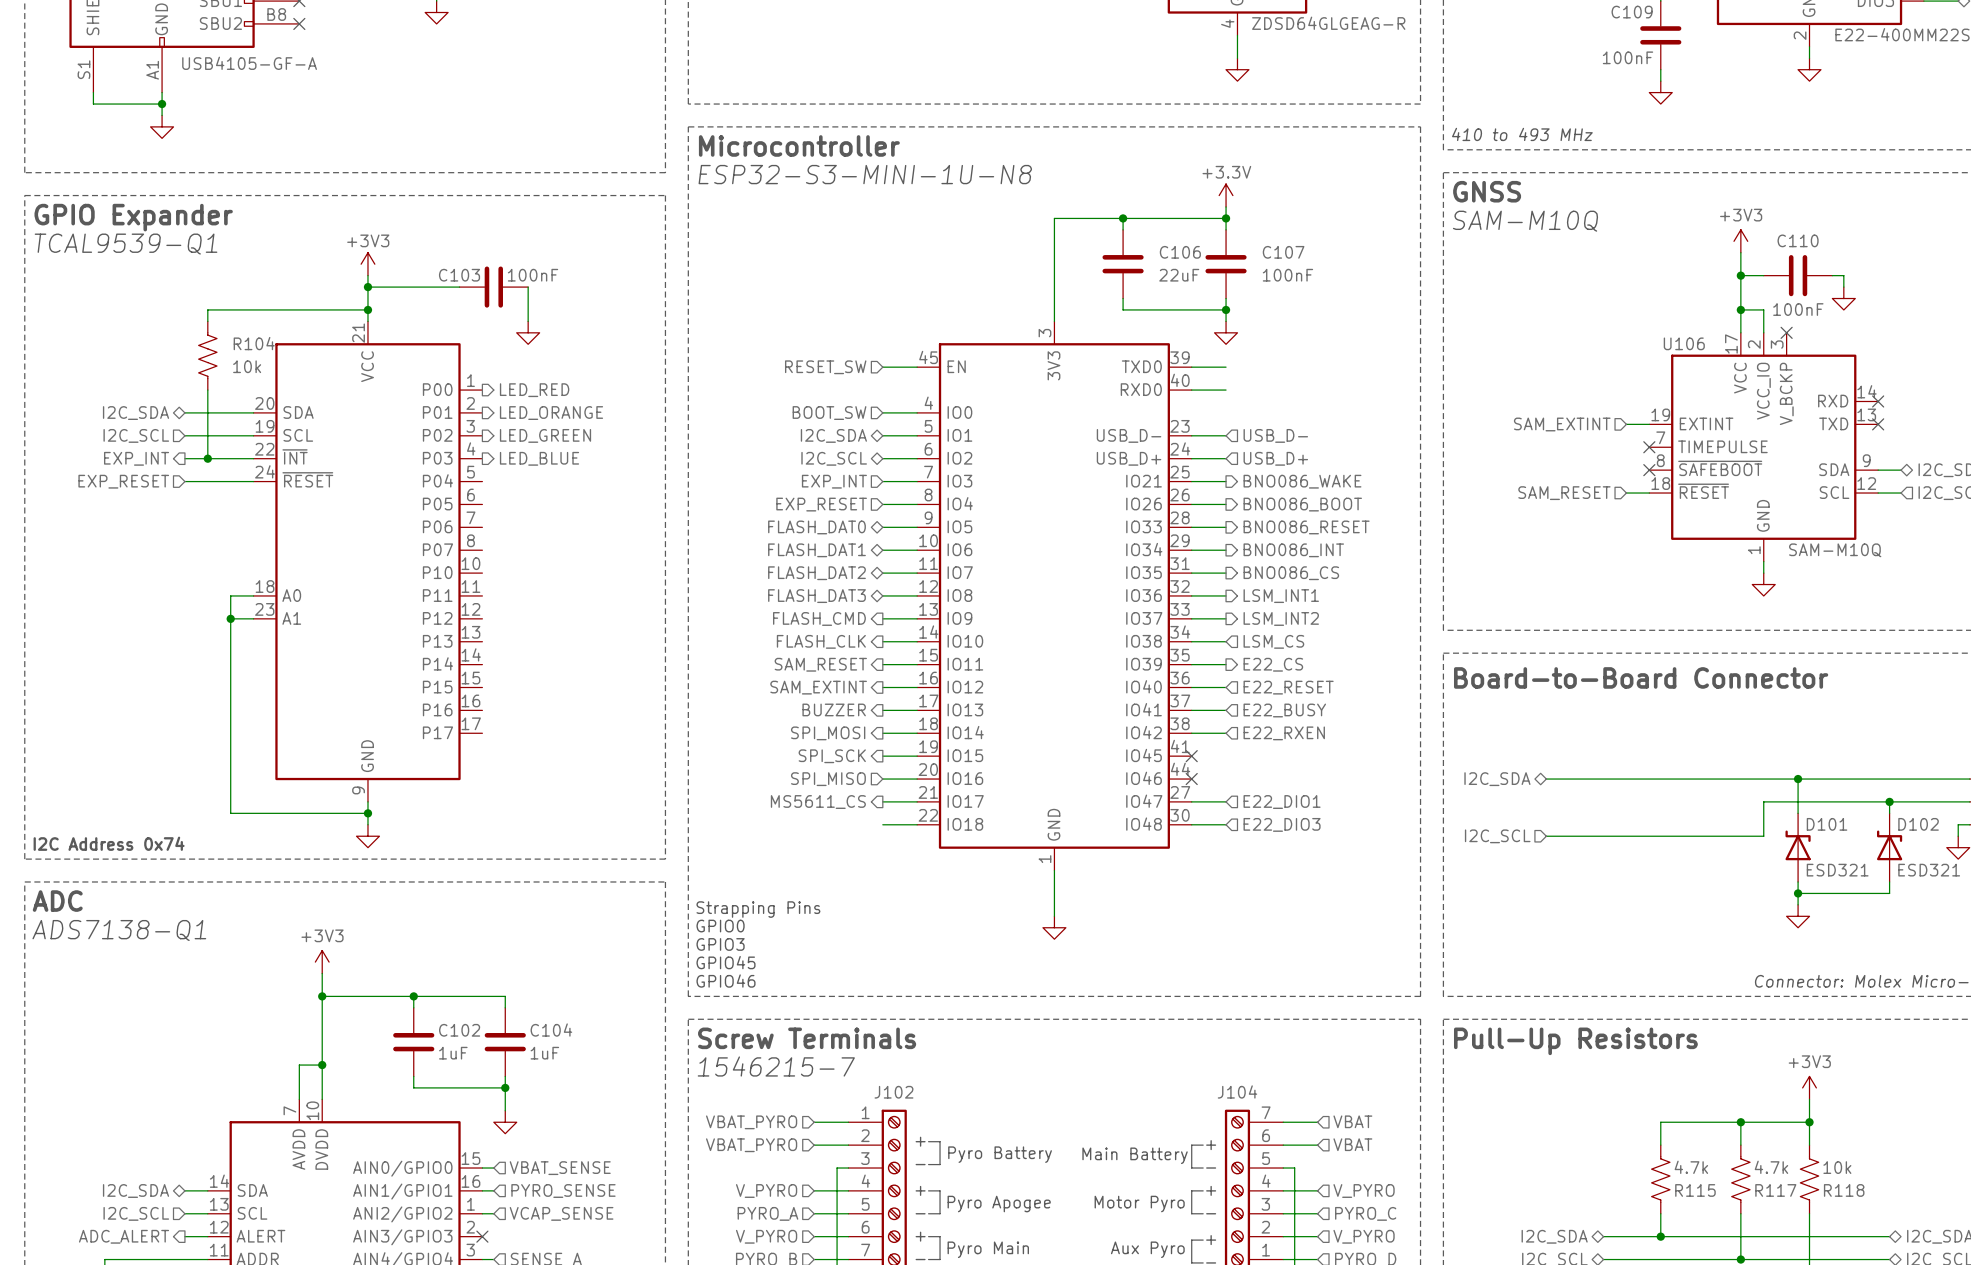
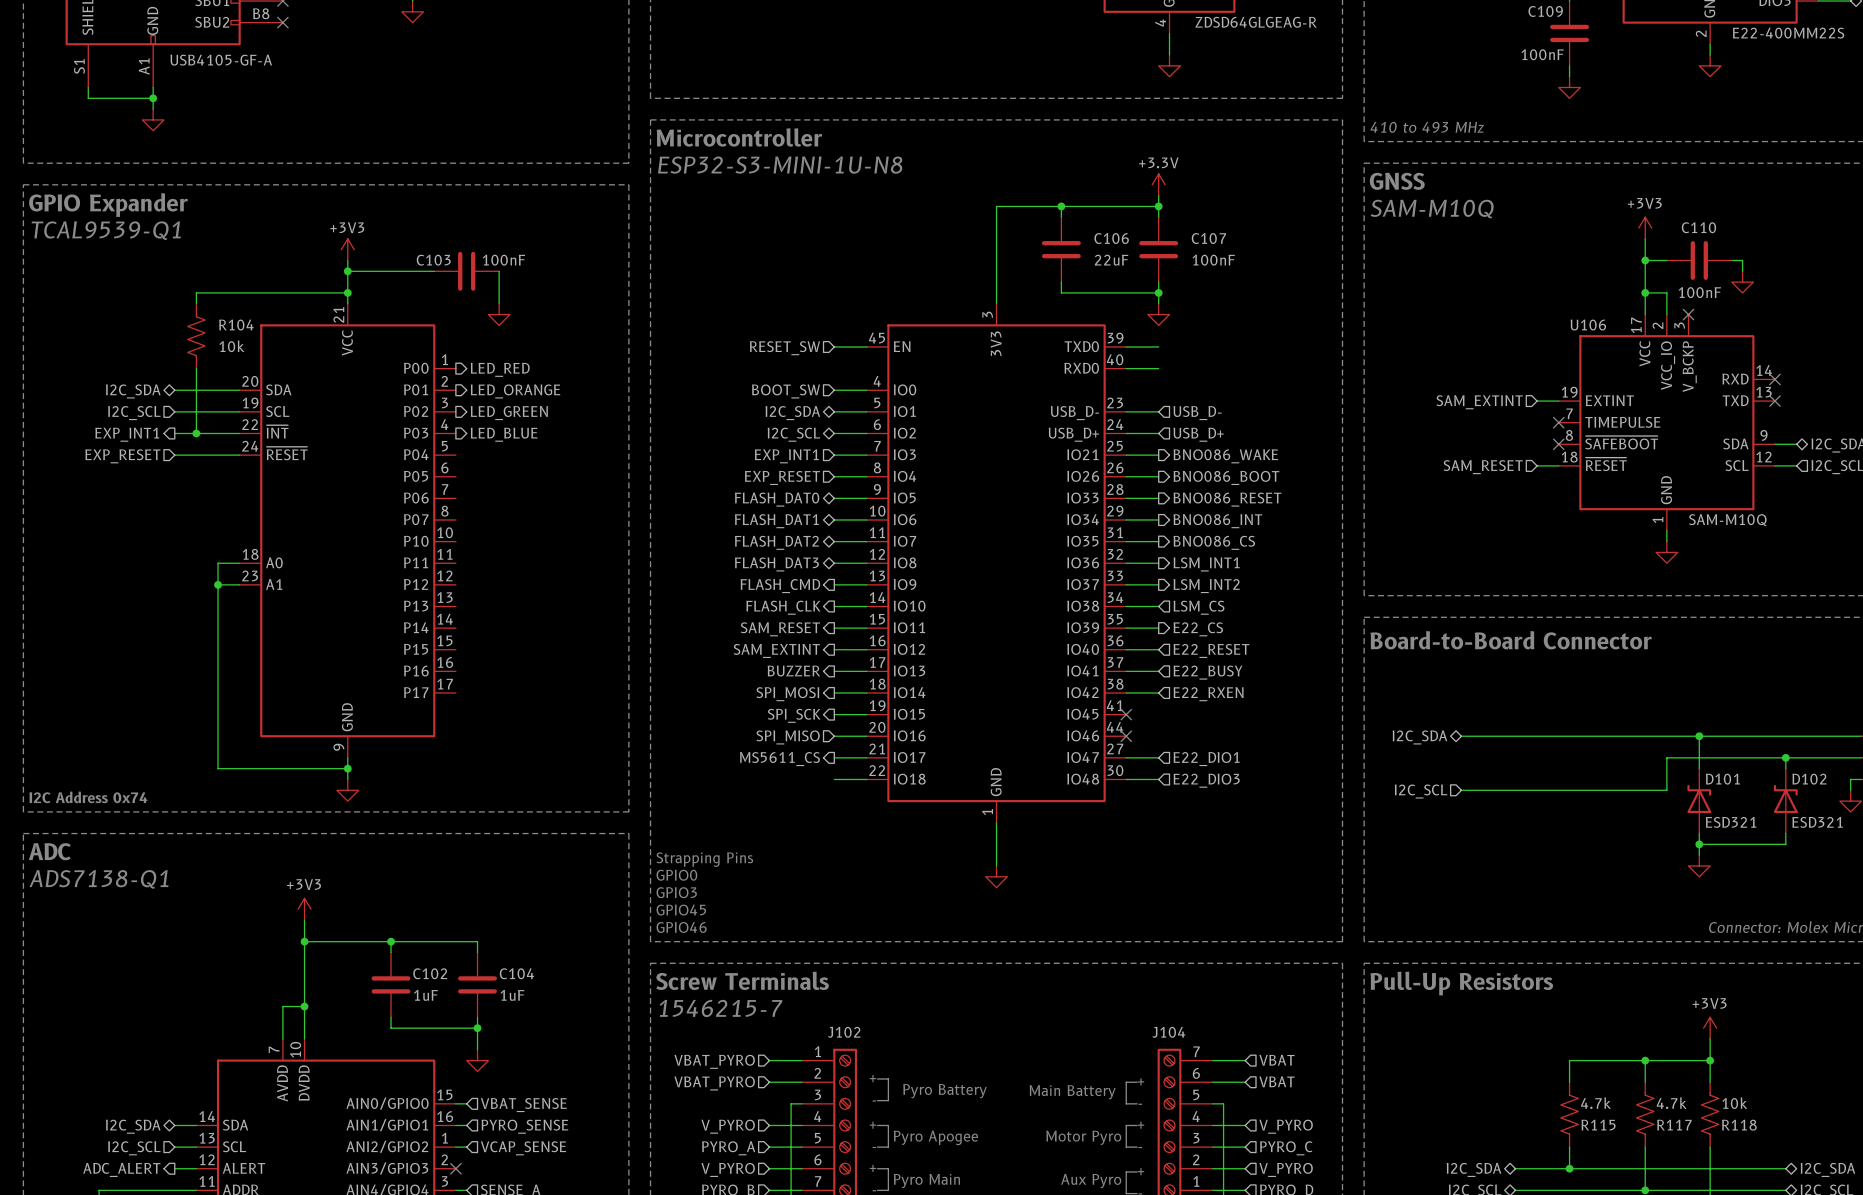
hierarchical label: EXP_INT (136, 458) -> EXP_INT1 (127, 434)
hierarchical label: EXP_INT (834, 481) -> EXP_INT1 (786, 456)

